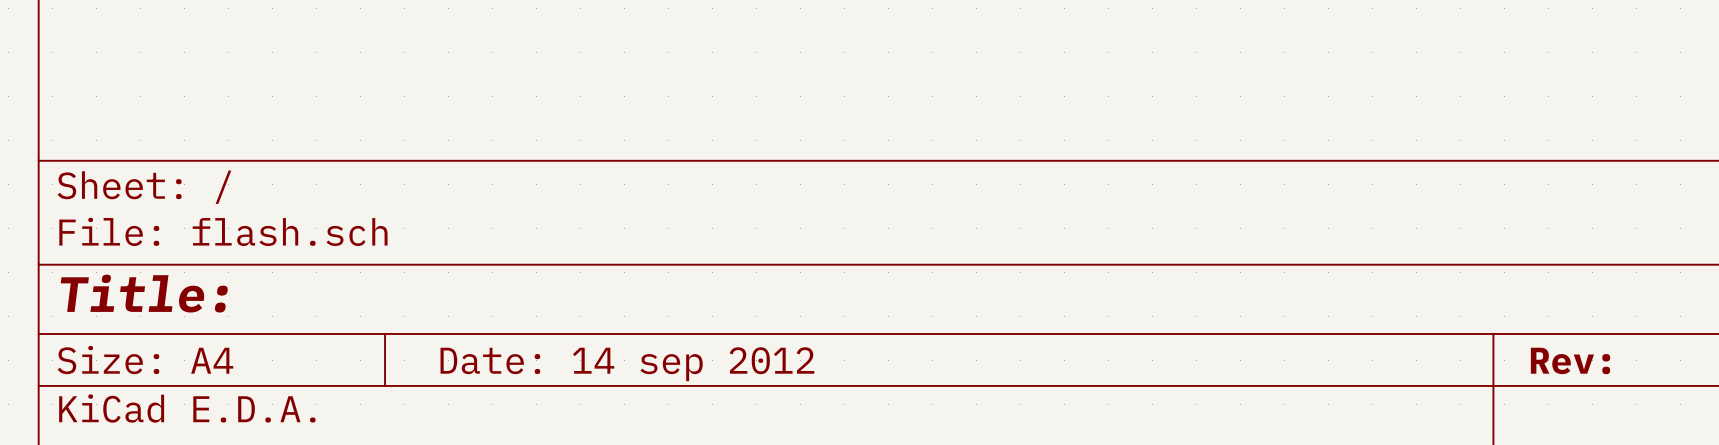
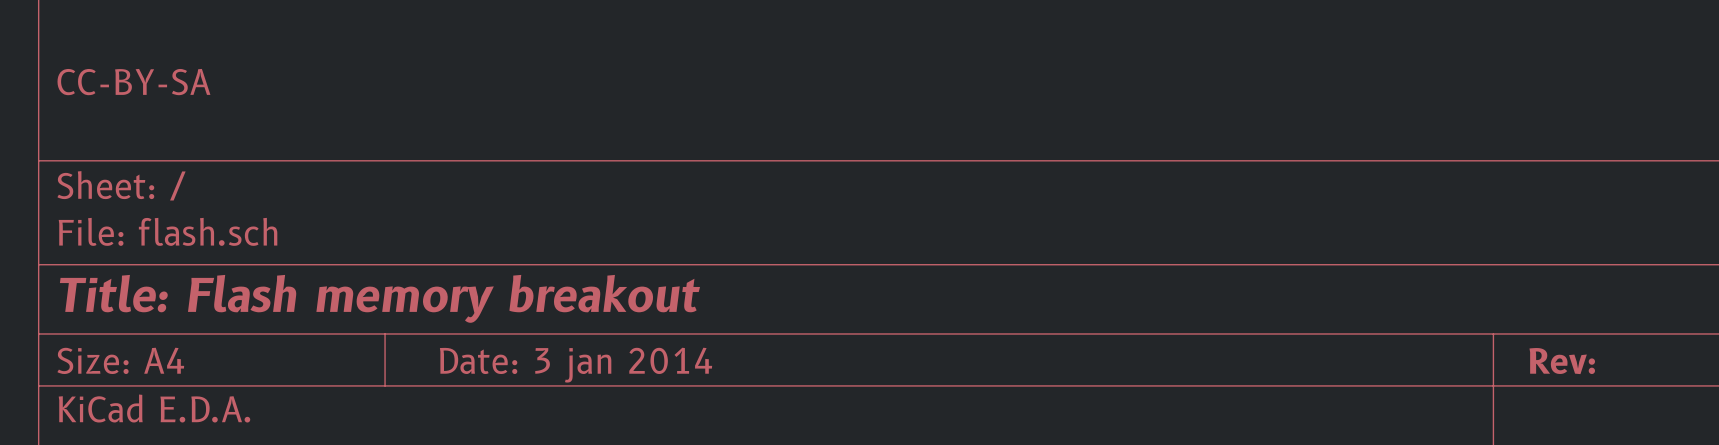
title block: none -> CC-BY-SA (133, 82)
title block: Title: (144, 293) -> Title: Flash memory breakout (379, 298)
title block: Date: 14 sep 2012 (627, 364) -> Date: 3 jan 2014 (576, 365)

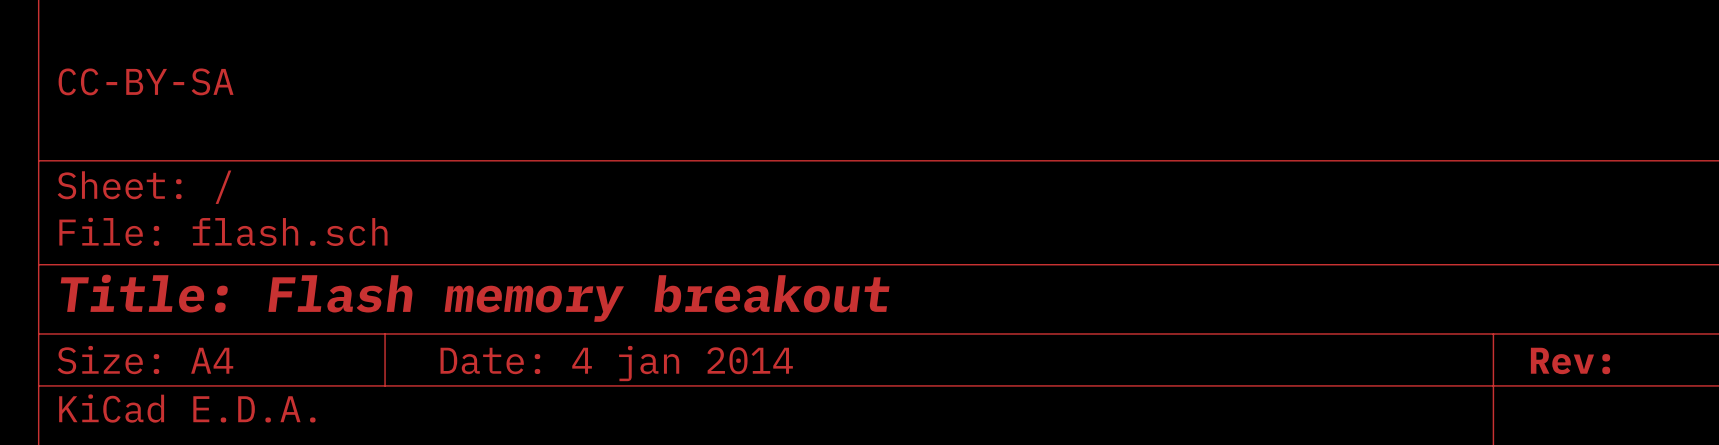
title block: Date: 3 jan 2014 (576, 365) -> Date: 4 jan 2014 (616, 363)

